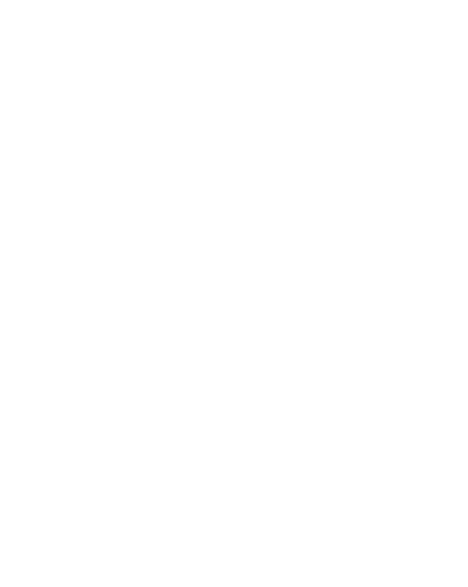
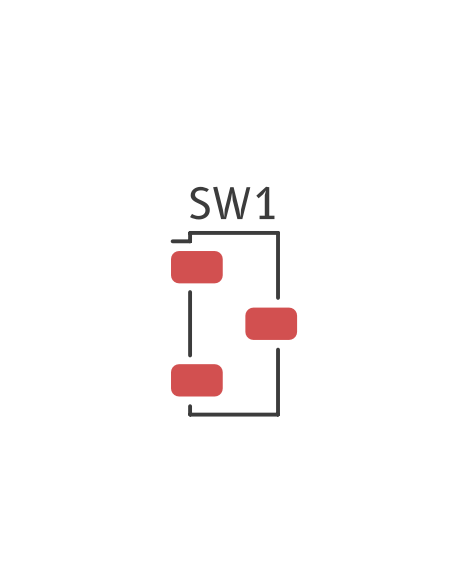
SW1: none -> (233, 323)

